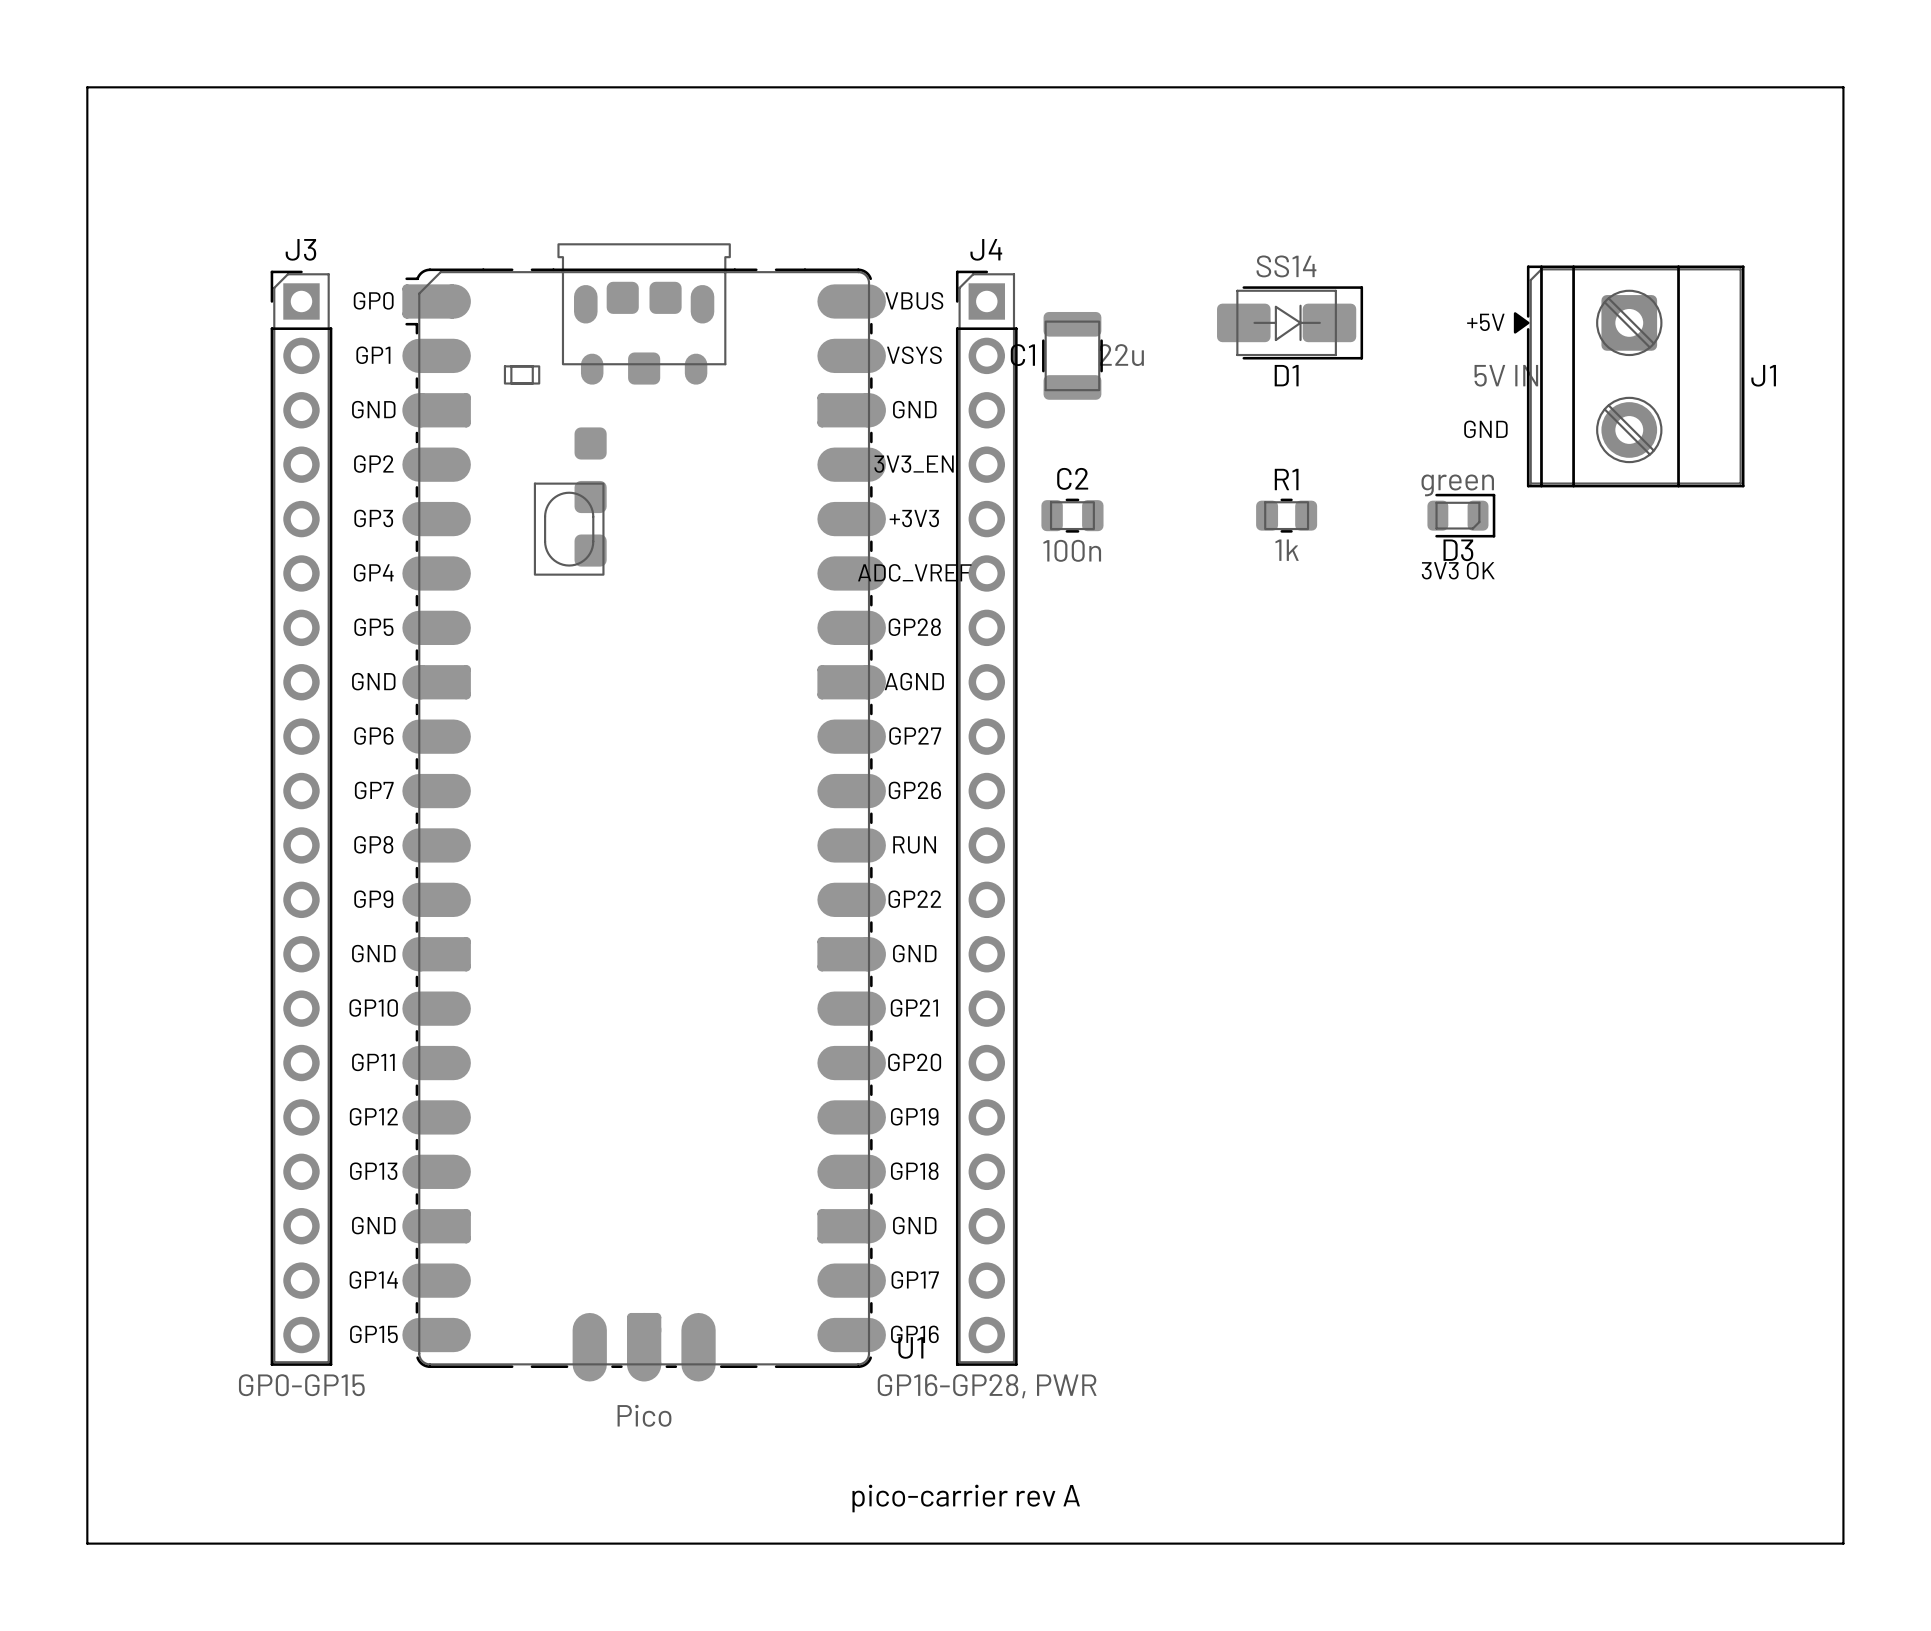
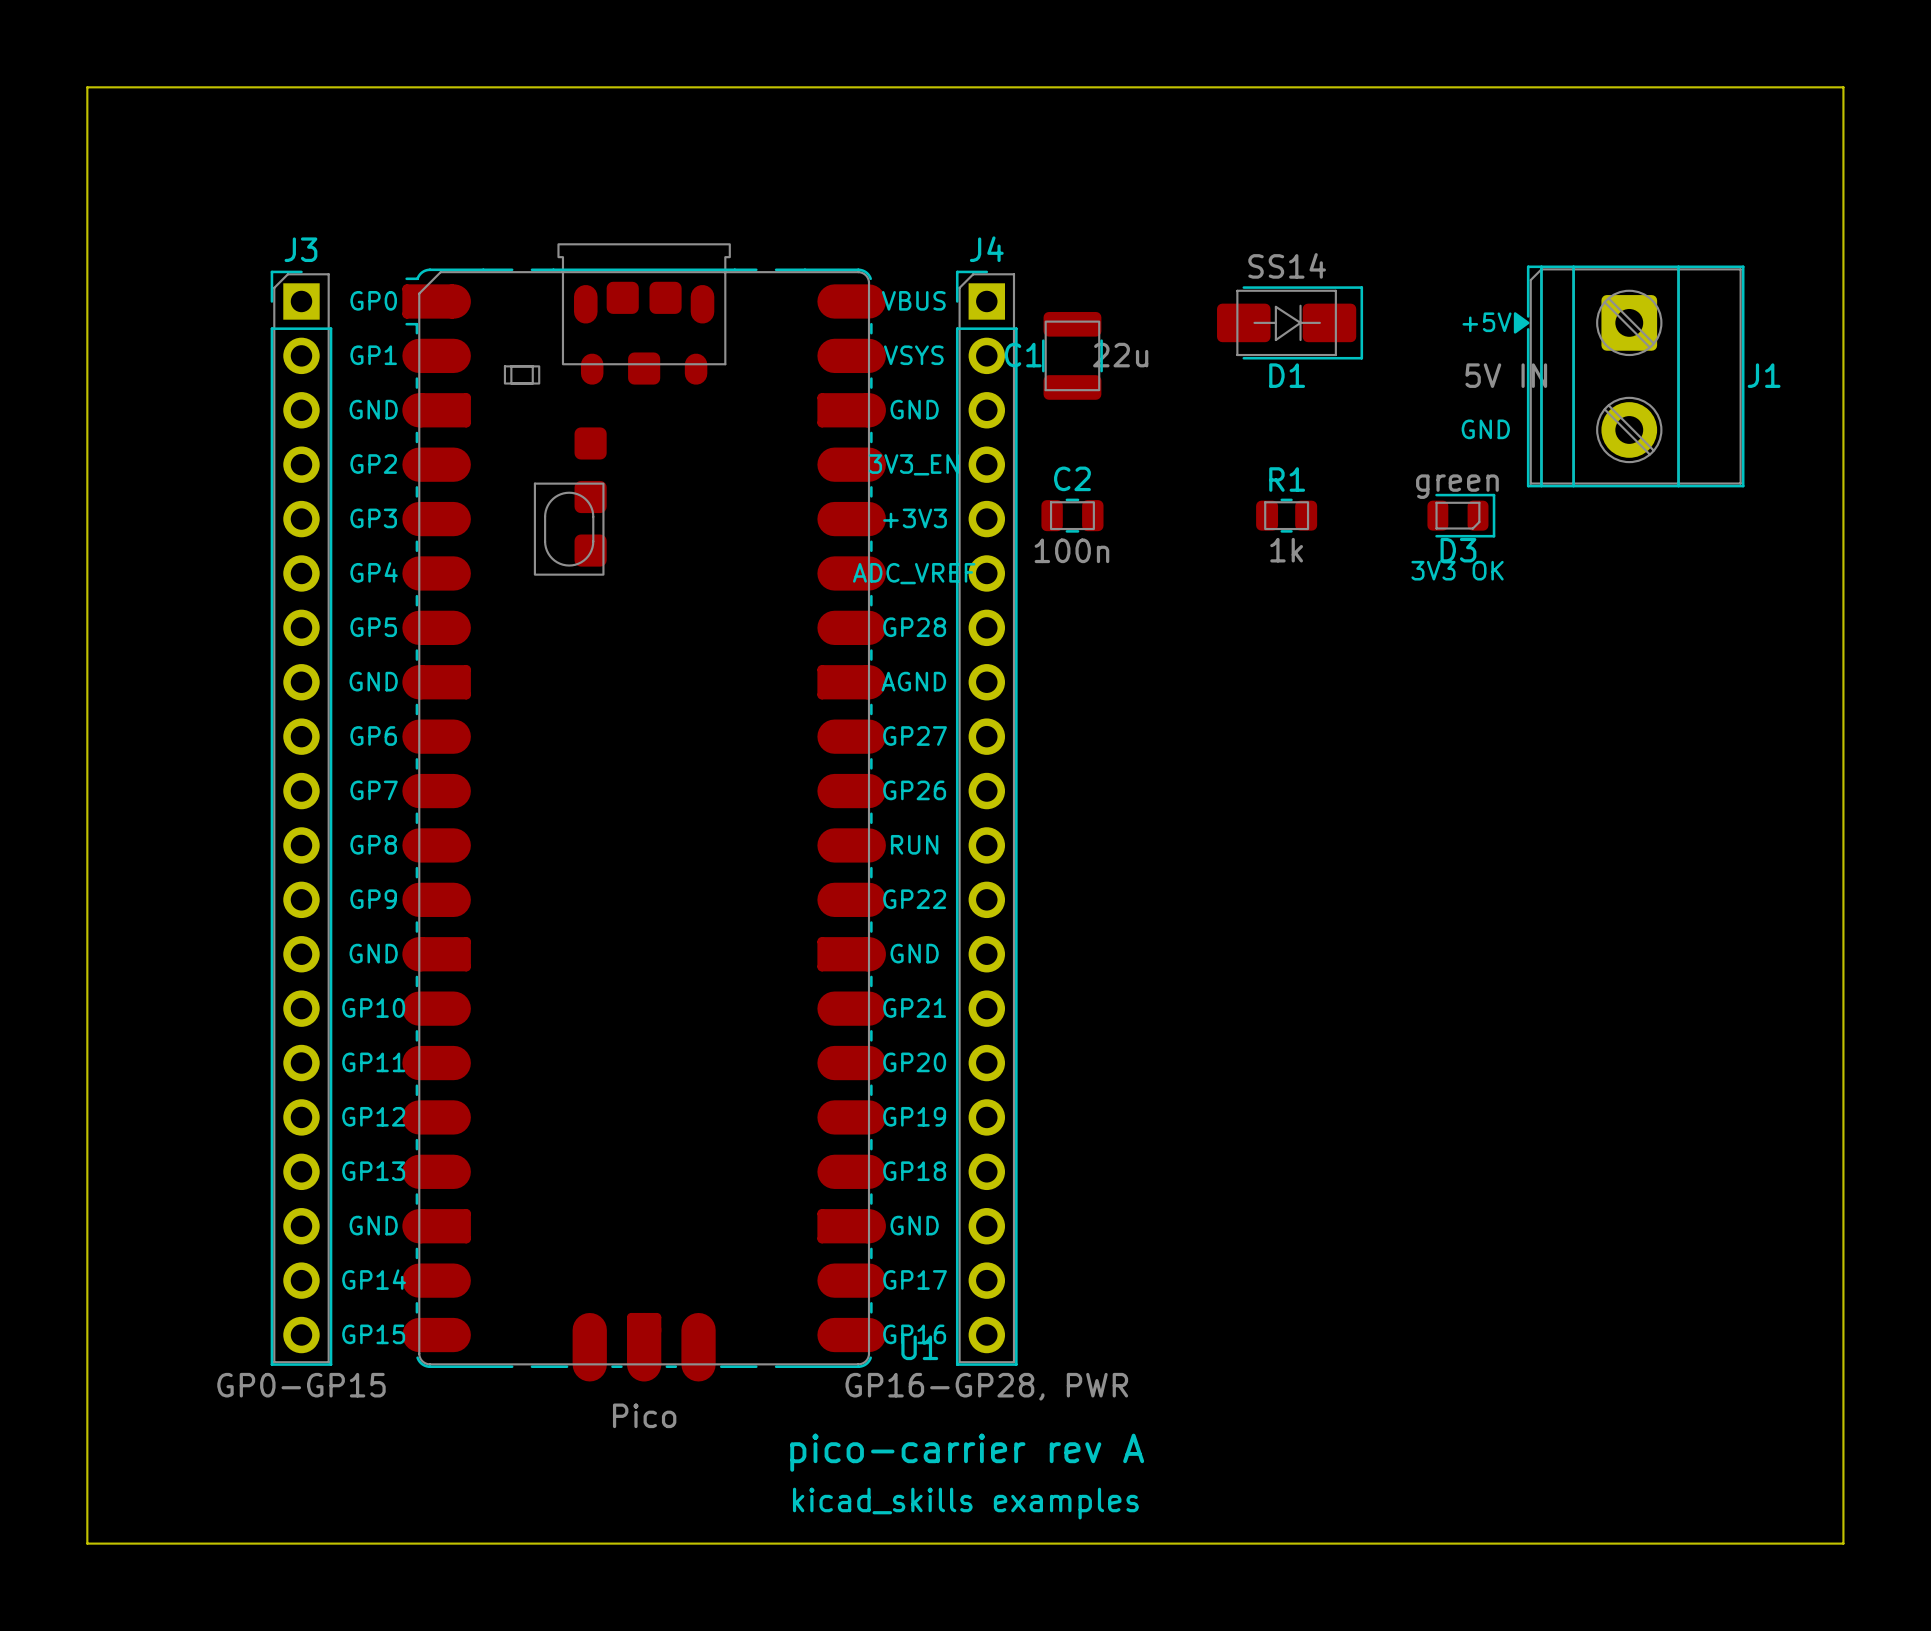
text: none -> pico-carrier rev A (967, 1452)
text: pico-carrier rev A (966, 1498) -> kicad_skills examples (965, 1503)

